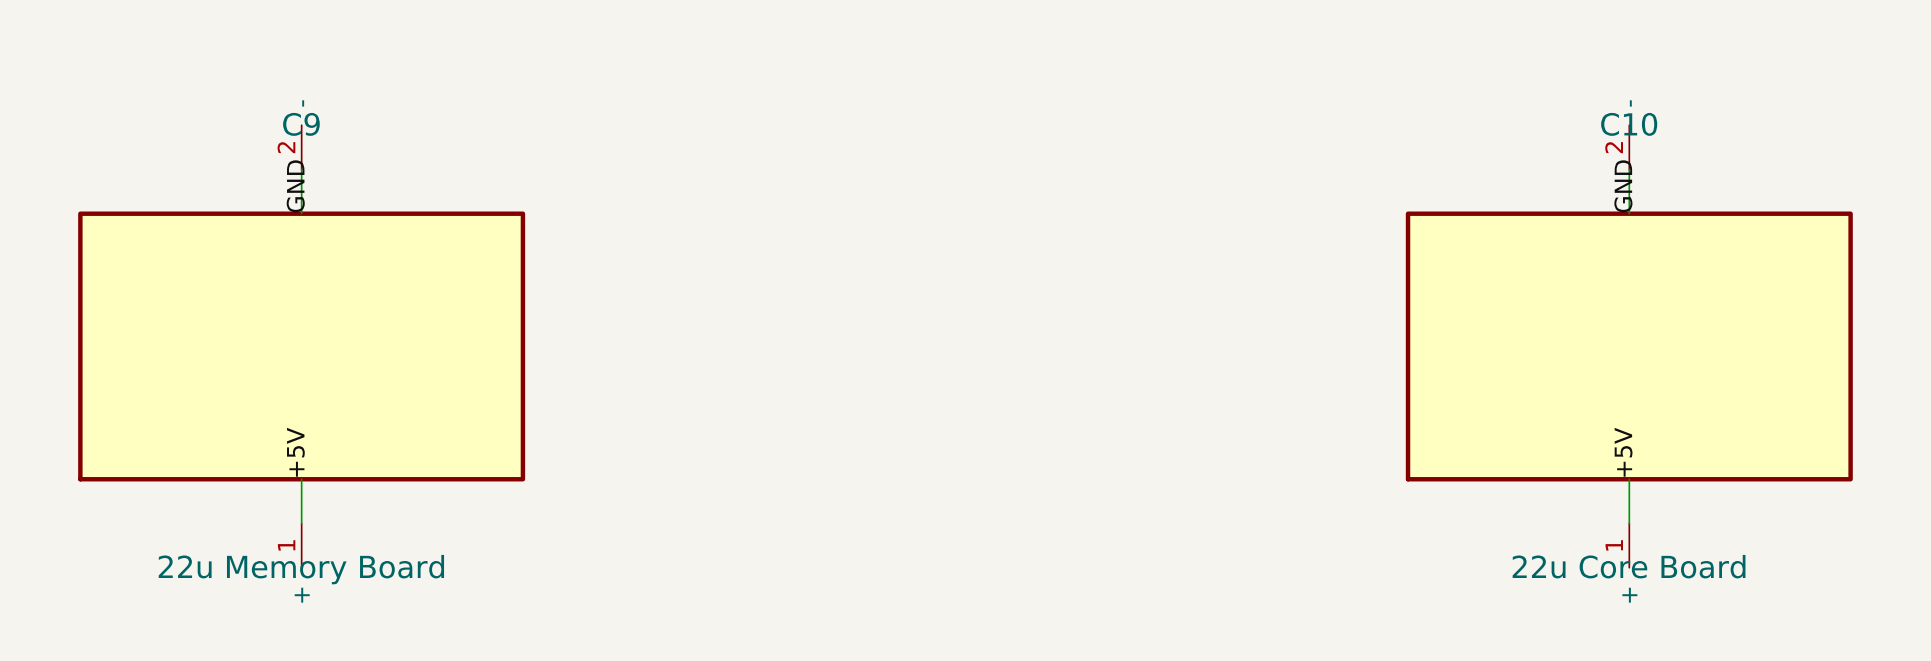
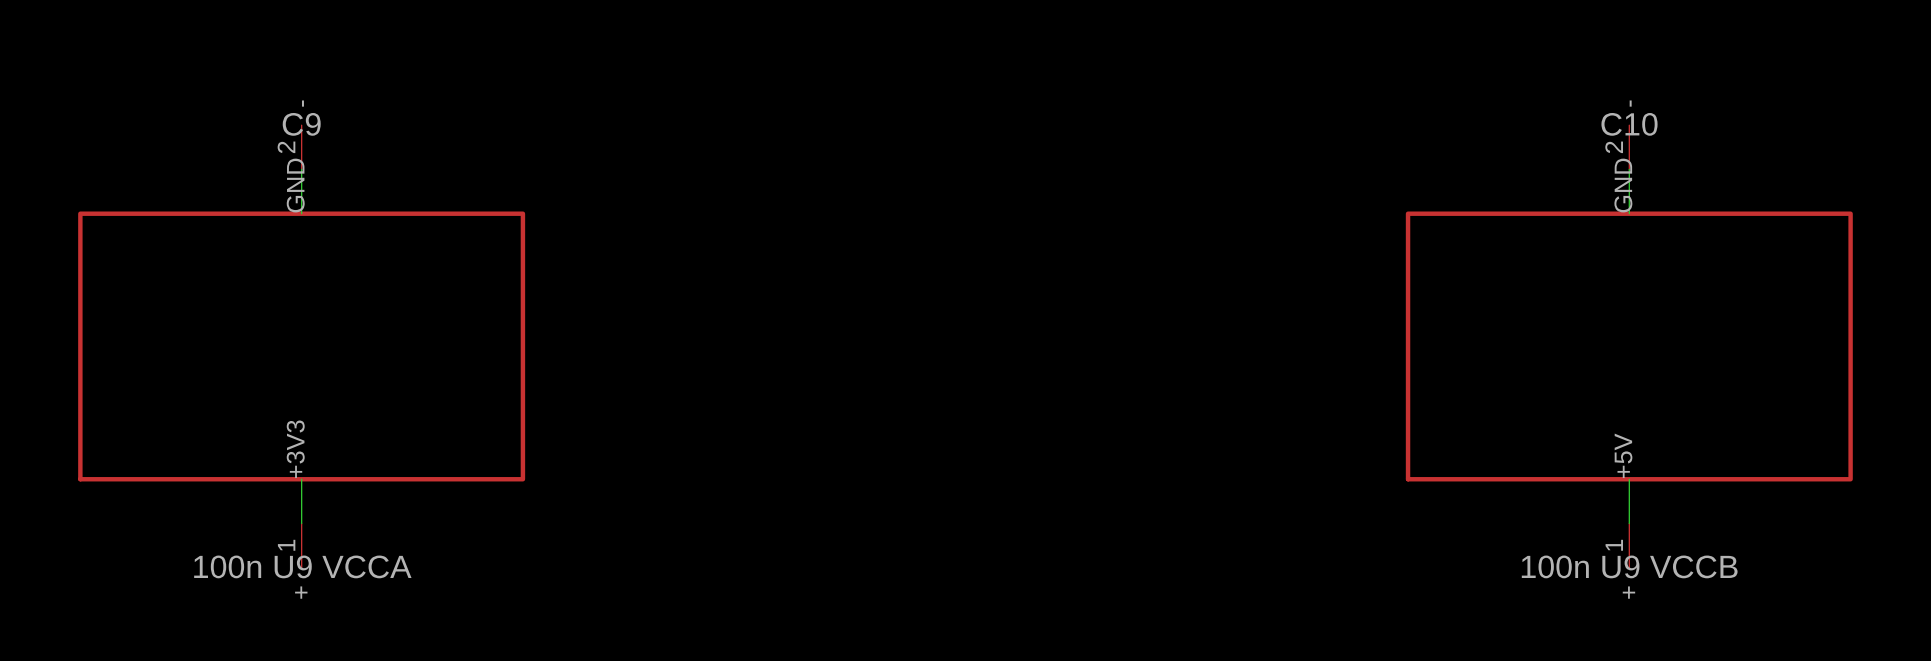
label: +5V (295, 452) -> +3V3 (295, 449)
C10 value: 22u Core Board (1629, 566) -> 100n U9 VCCB (1629, 566)
C9 value: 22u Memory Board (301, 569) -> 100n U9 VCCA (302, 566)

